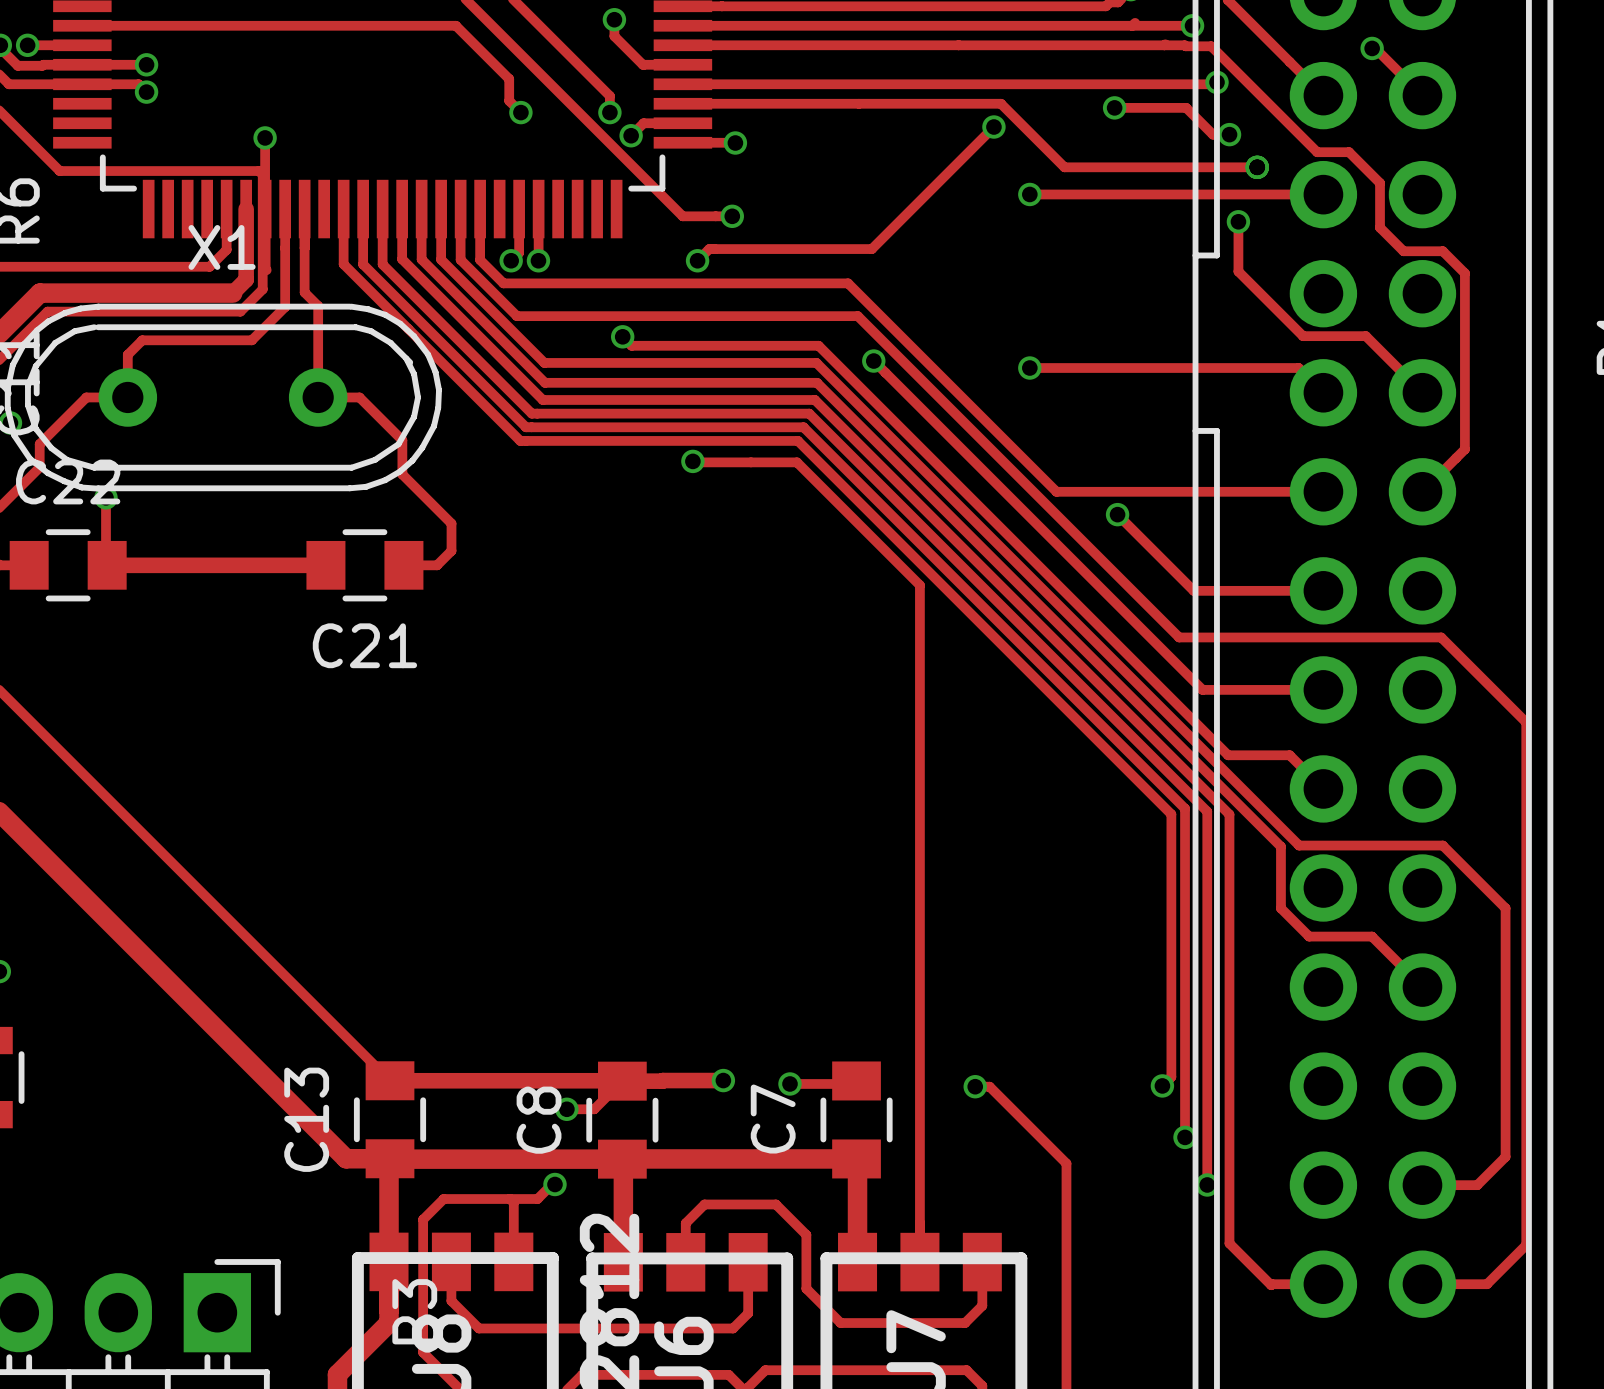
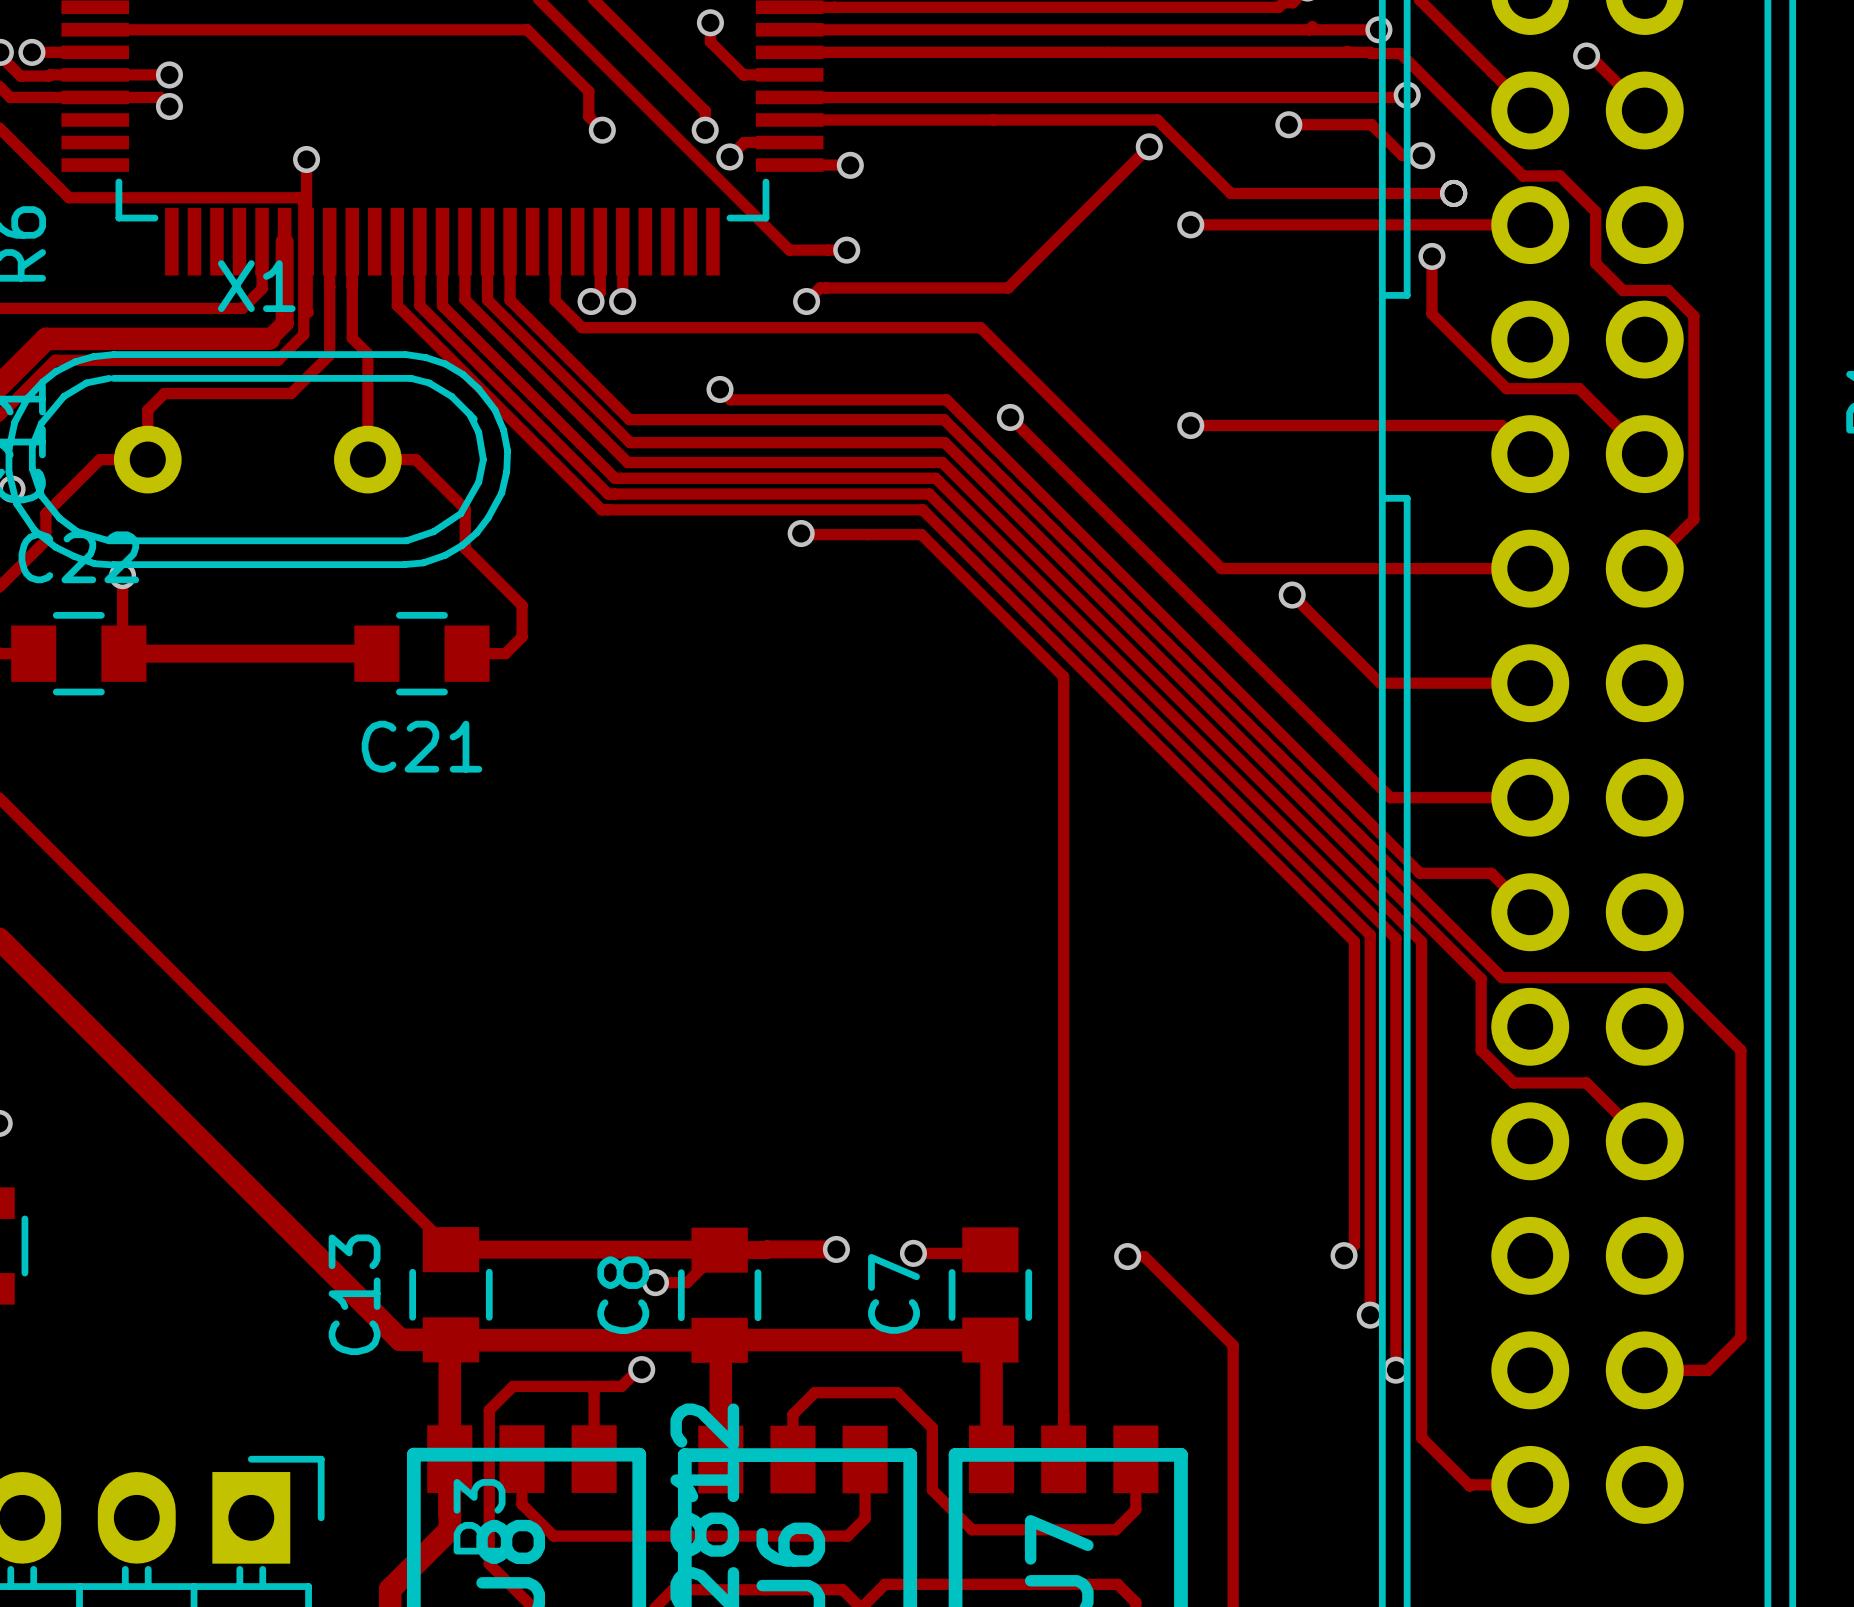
track: (460, 209) (460, 259) (516, 316) (857, 316) (1179, 637) (1441, 637) (1526, 722) (1526, 1245) (1487, 1284) (1422, 1284) -> none

